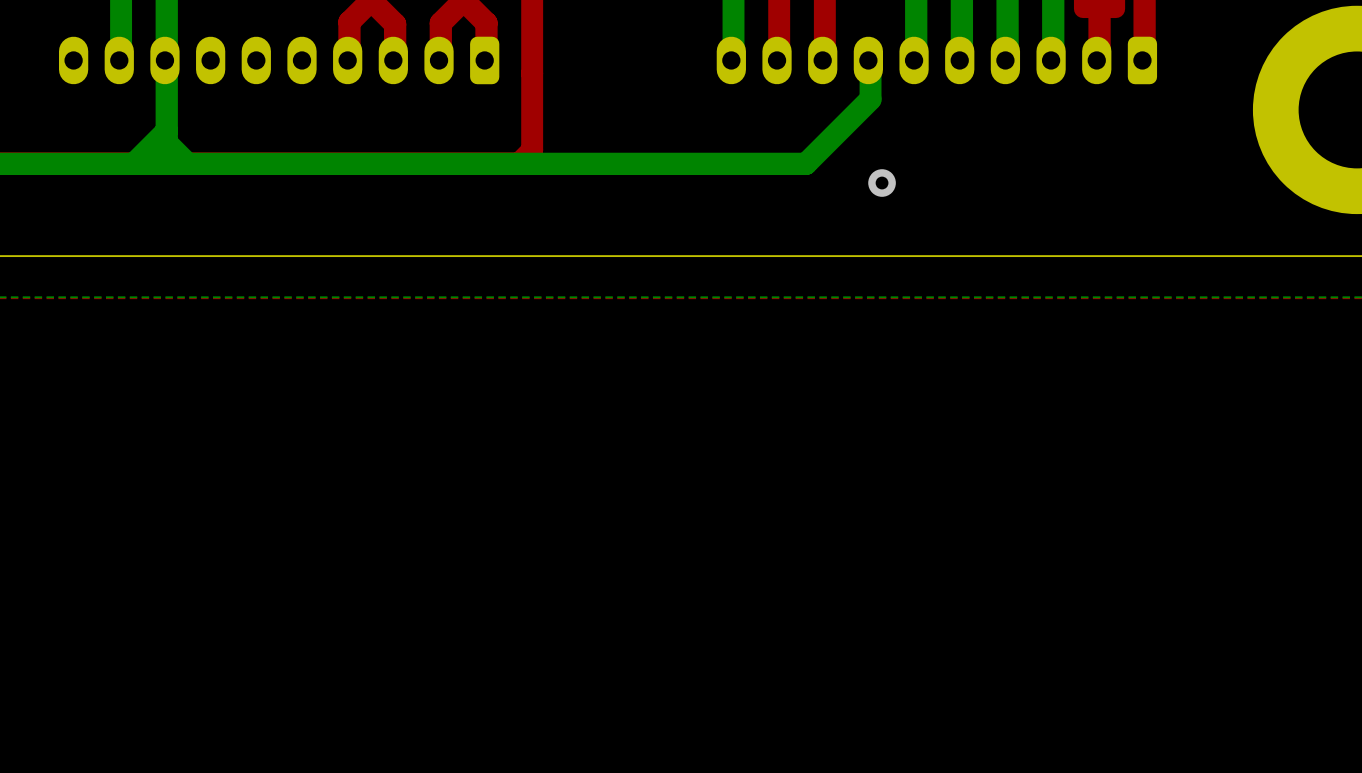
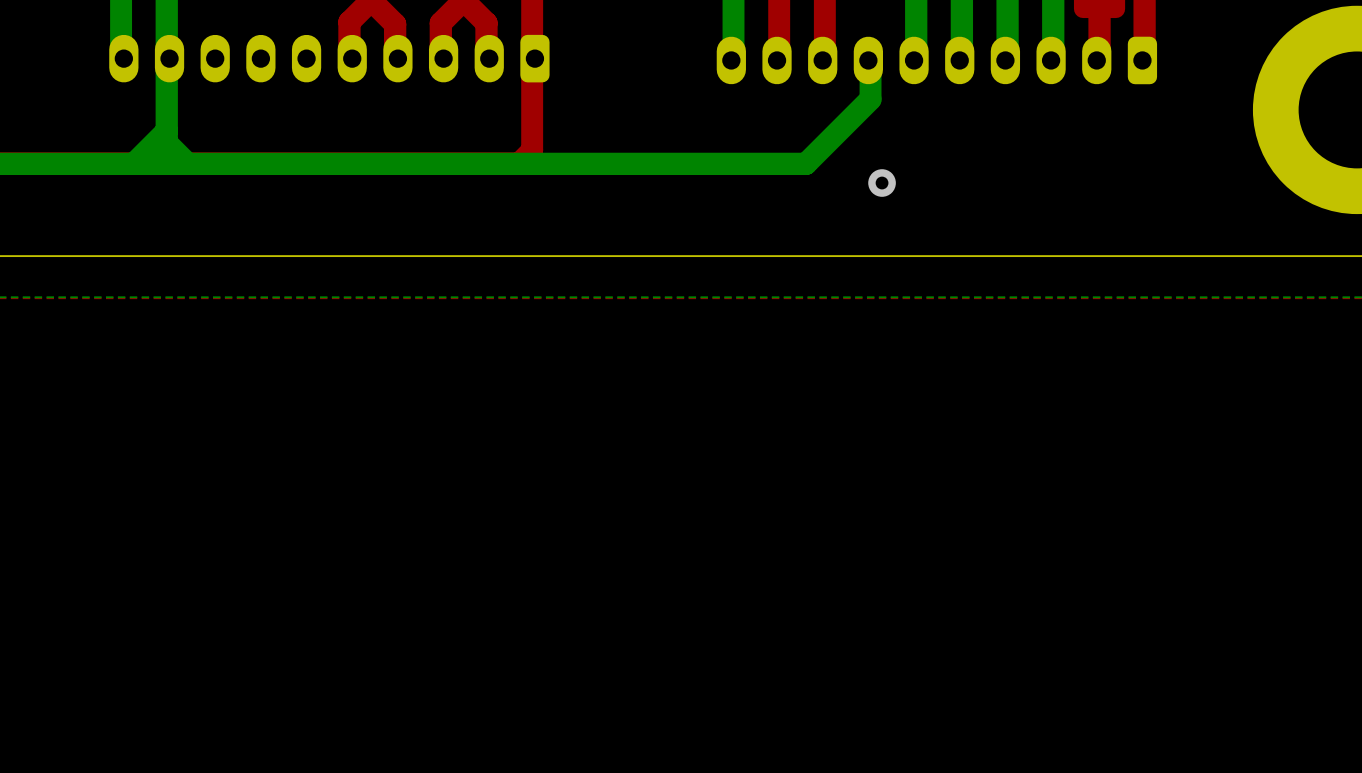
part position: (279, 60) -> (329, 58)

